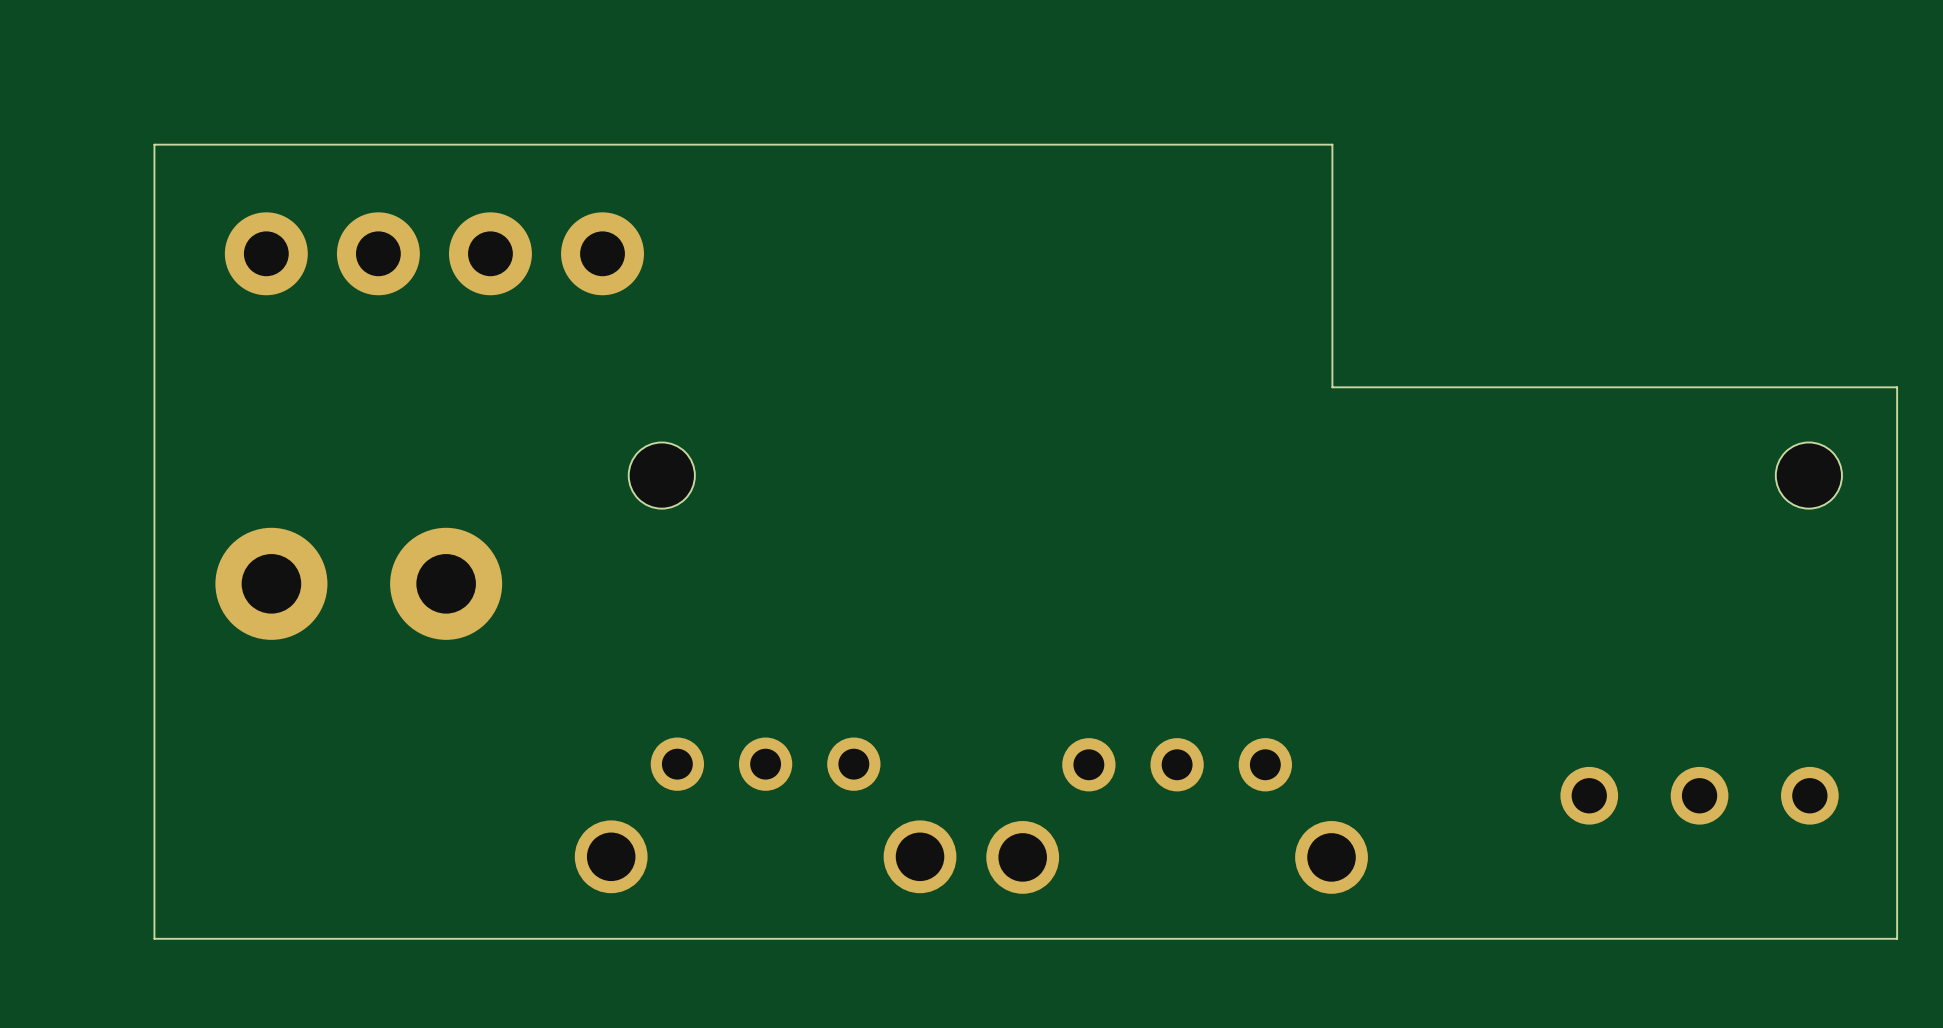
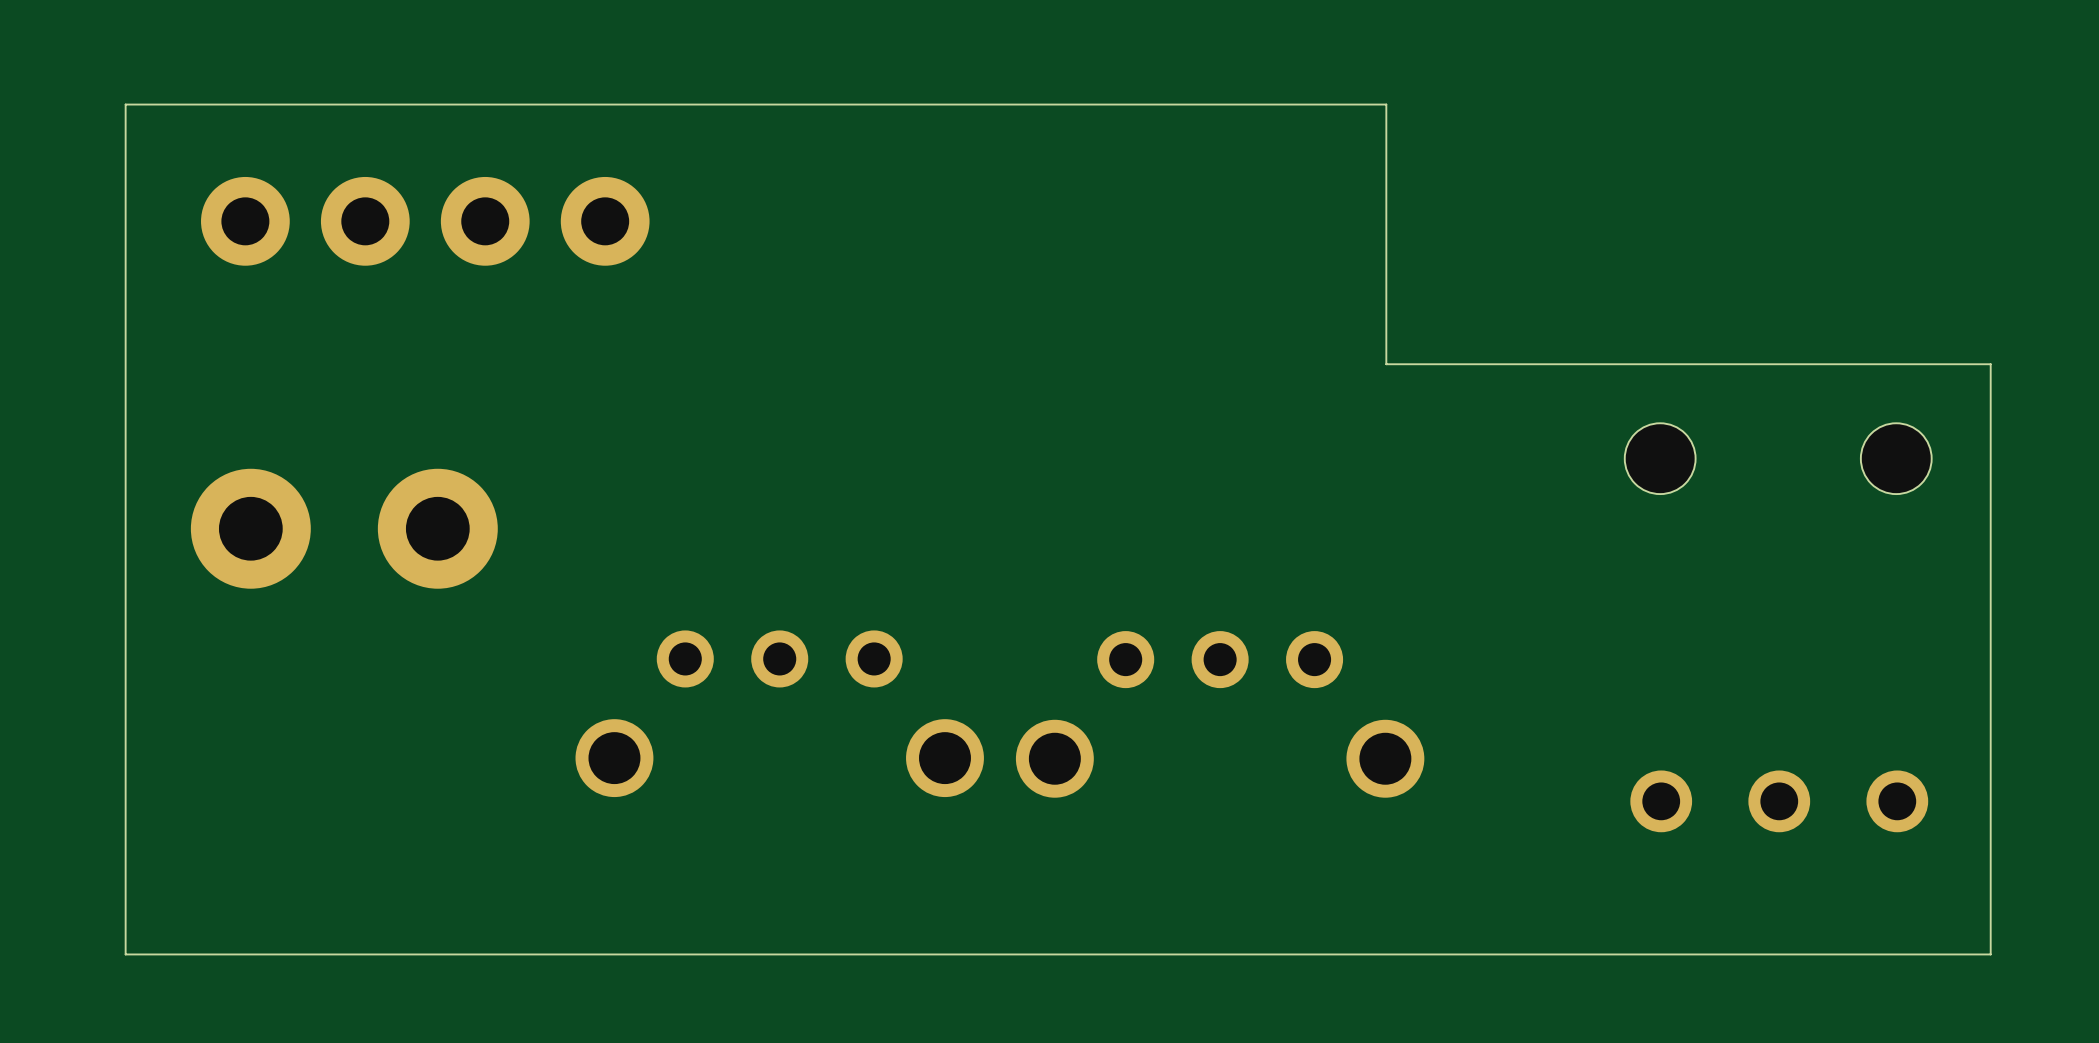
hole position: (661, 475) -> (1660, 458)
part position: (358, 583) -> (344, 528)
part position: (765, 815) -> (779, 713)
part position: (1177, 815) -> (1220, 714)

